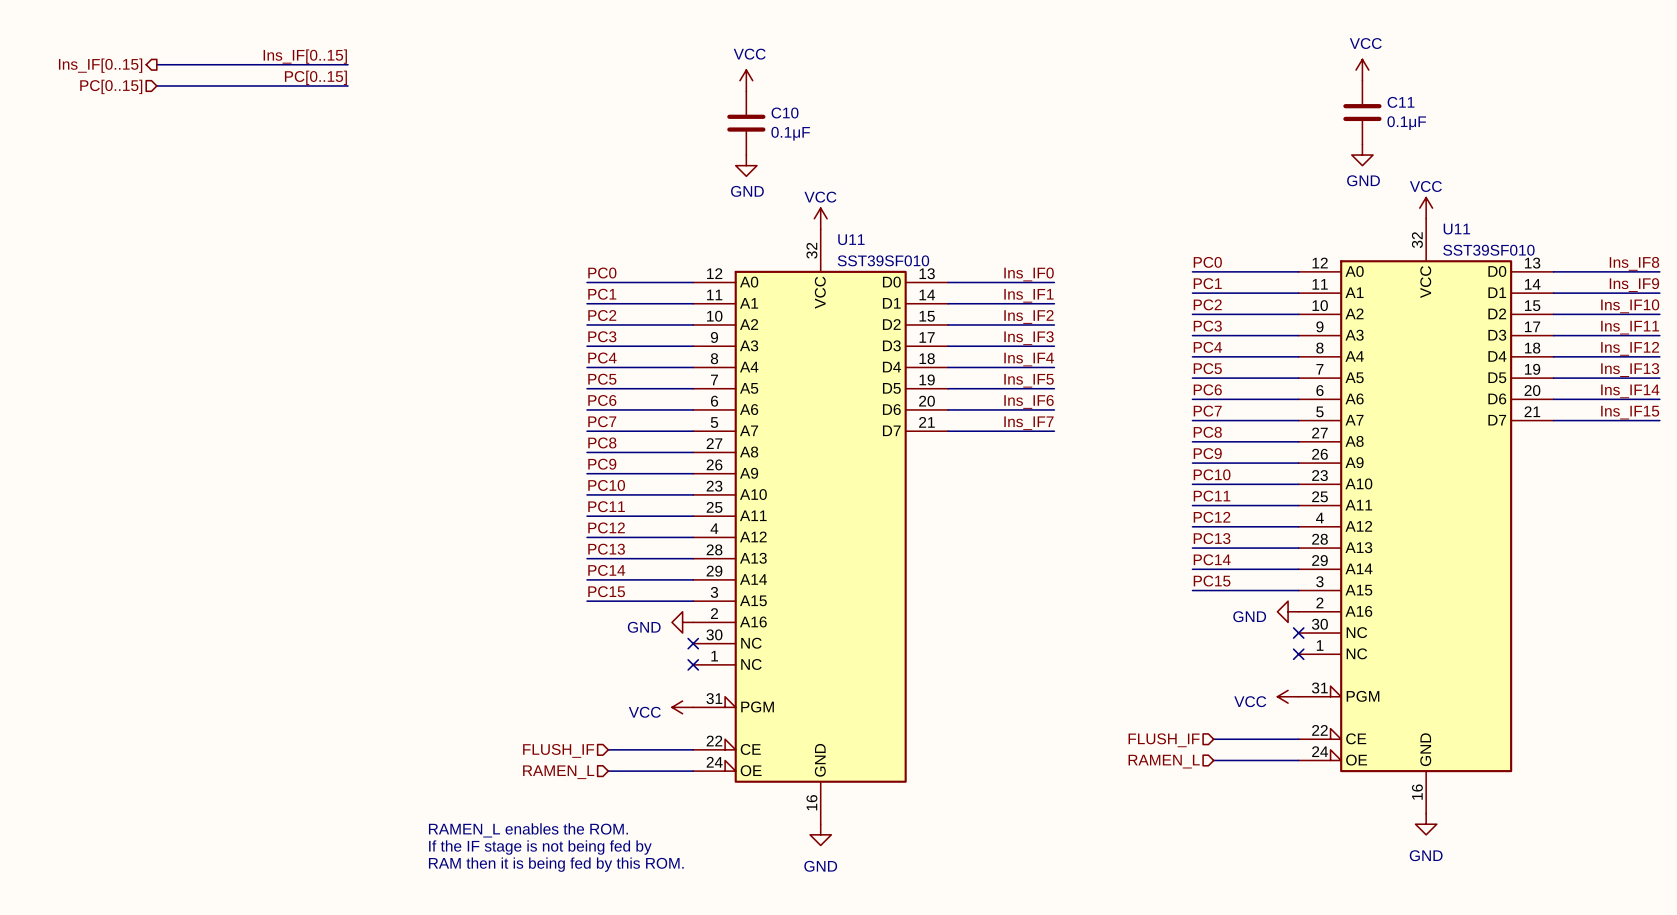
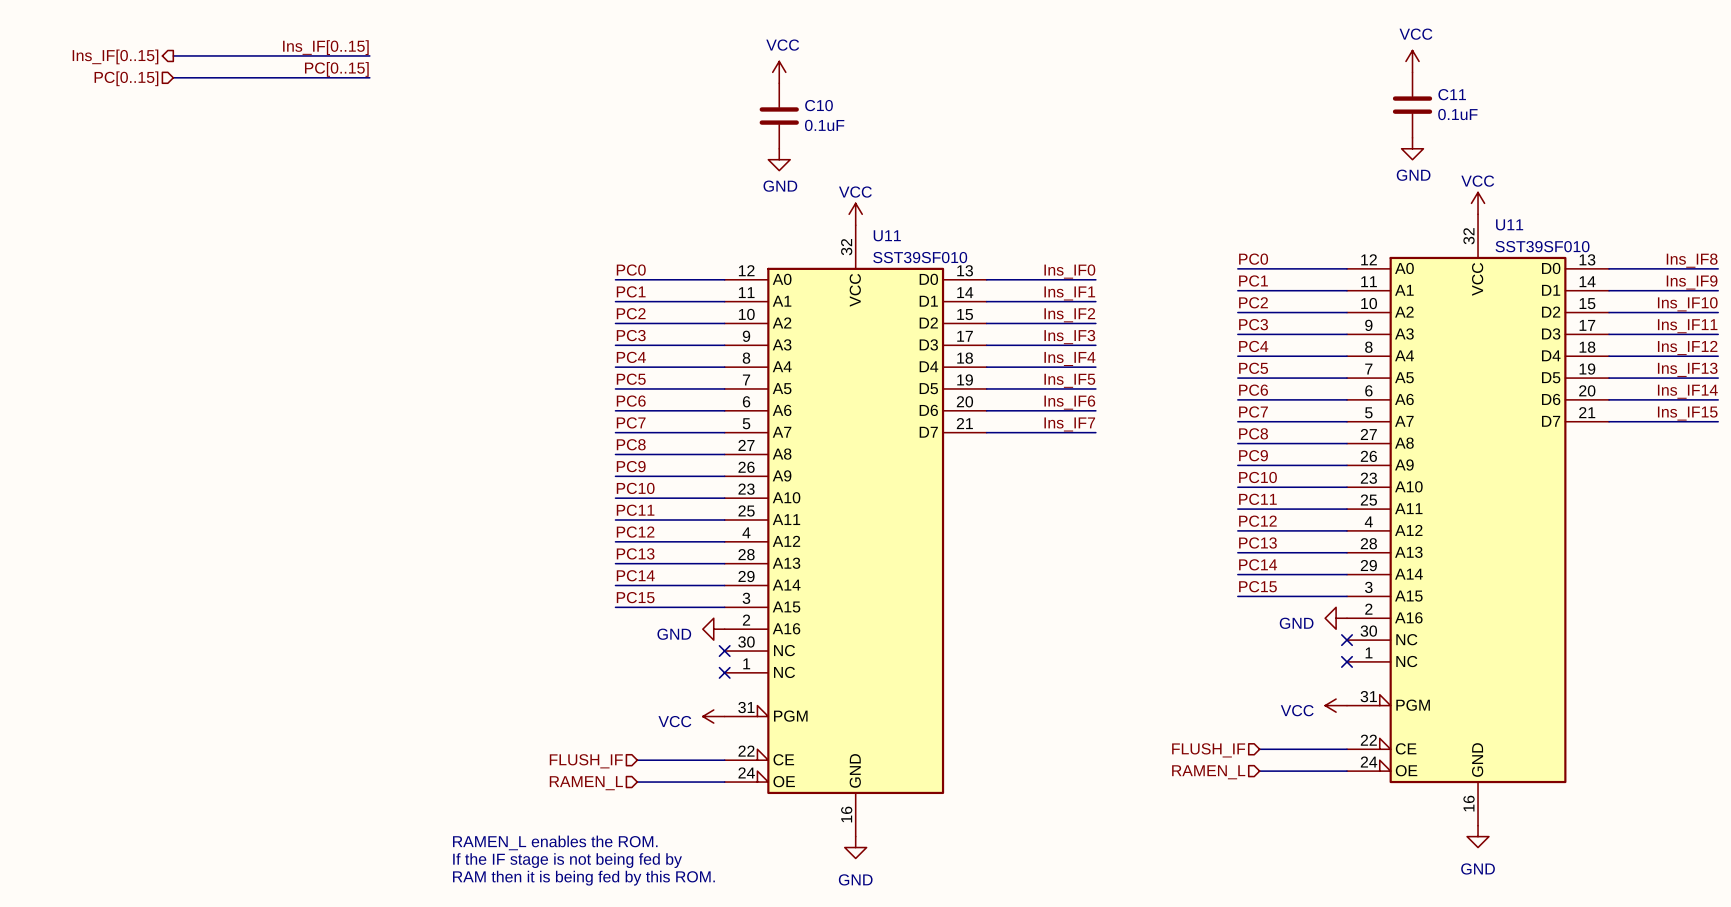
C11 value: 0.1μF (1406, 123) -> 0.1uF (1457, 114)
C10 value: 0.1μF (790, 133) -> 0.1uF (824, 125)

